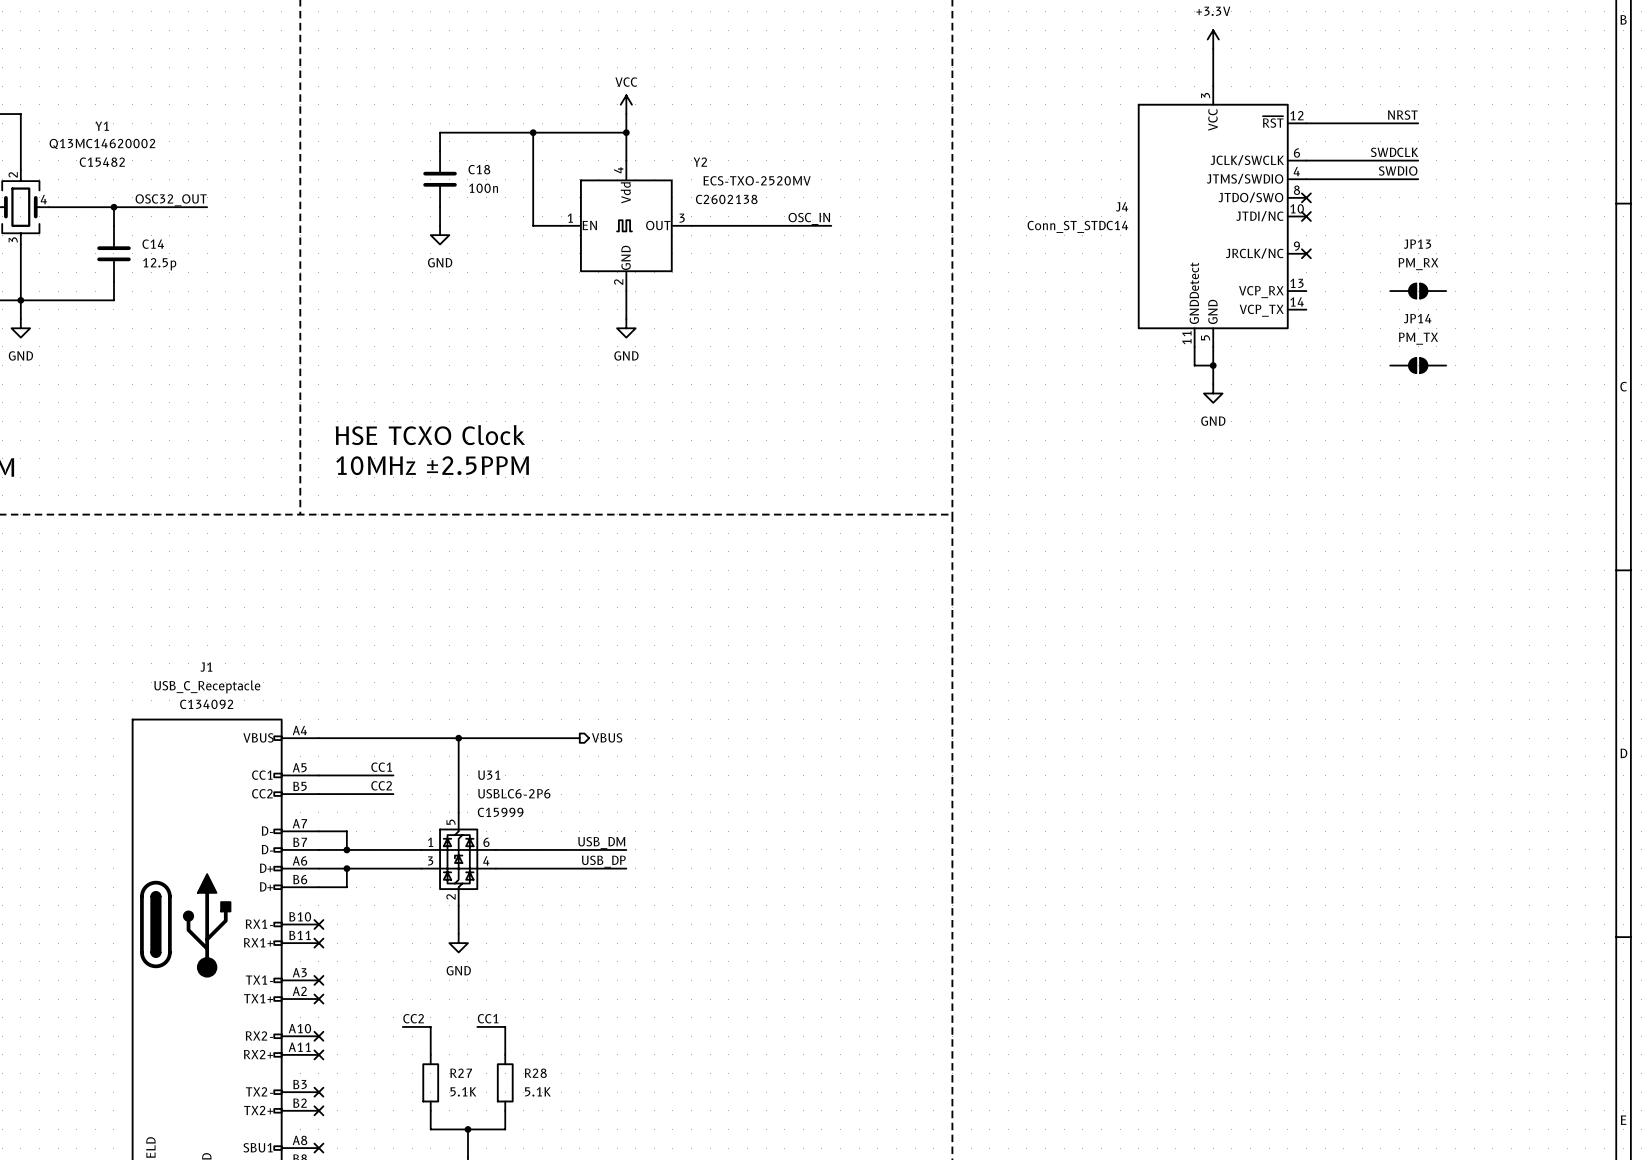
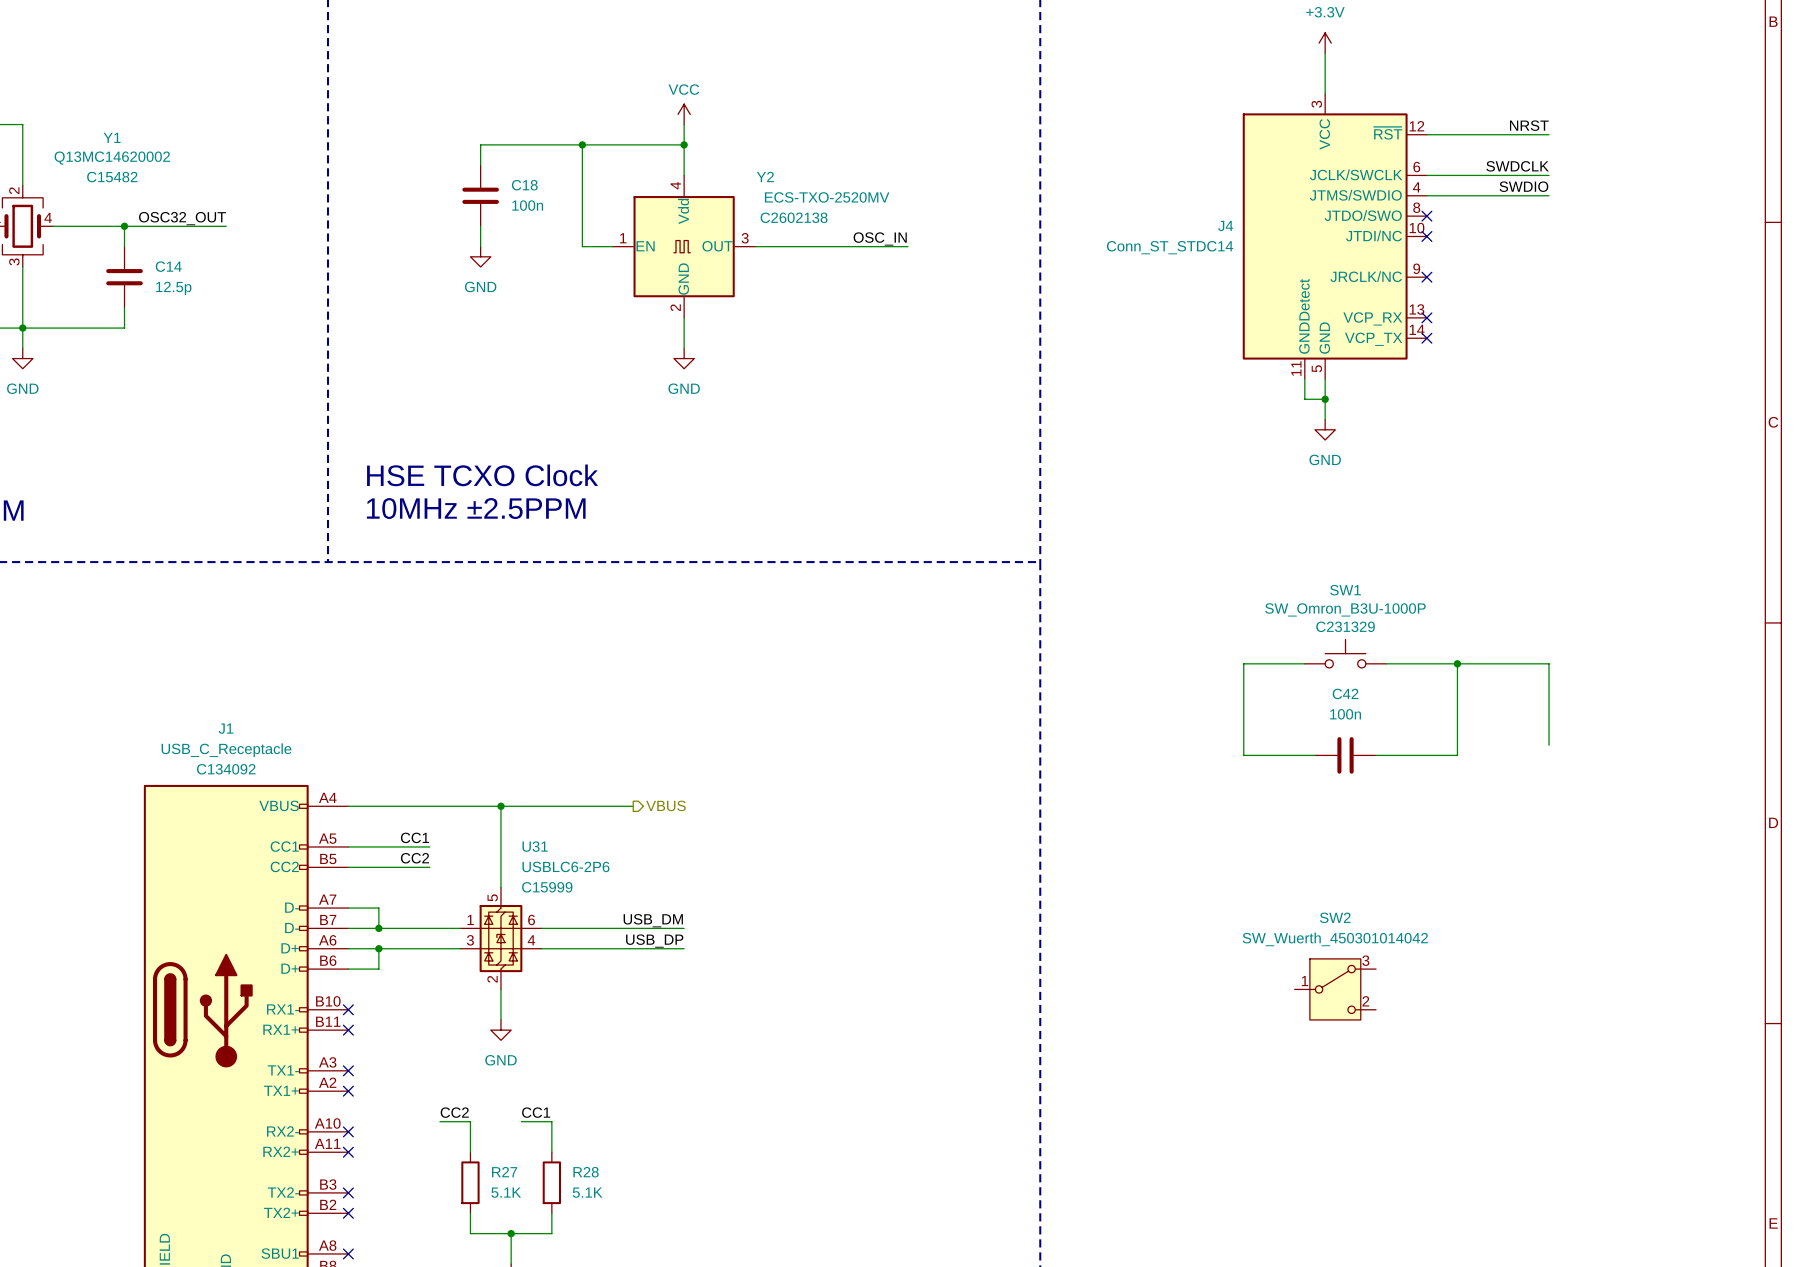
no-connect mark: none -> (1426, 317)
JP13: PM_RX (1418, 291) -> none
no-connect mark: none -> (1426, 338)
JP14: PM_TX (1418, 365) -> none
SW1: none -> SW_Omron_B3U-1000P (1345, 653)
wire: none -> (1304, 663) (1243, 663) (1243, 755) (1314, 755)
wire: none -> (1386, 663) (1549, 663) (1549, 745)
wire: none -> (1457, 663) (1457, 755) (1376, 755)
junction: none -> (1457, 663)
C42: none -> 100n (1345, 755)
SW2: none -> SW_Wuerth_450301014042 (1335, 989)

